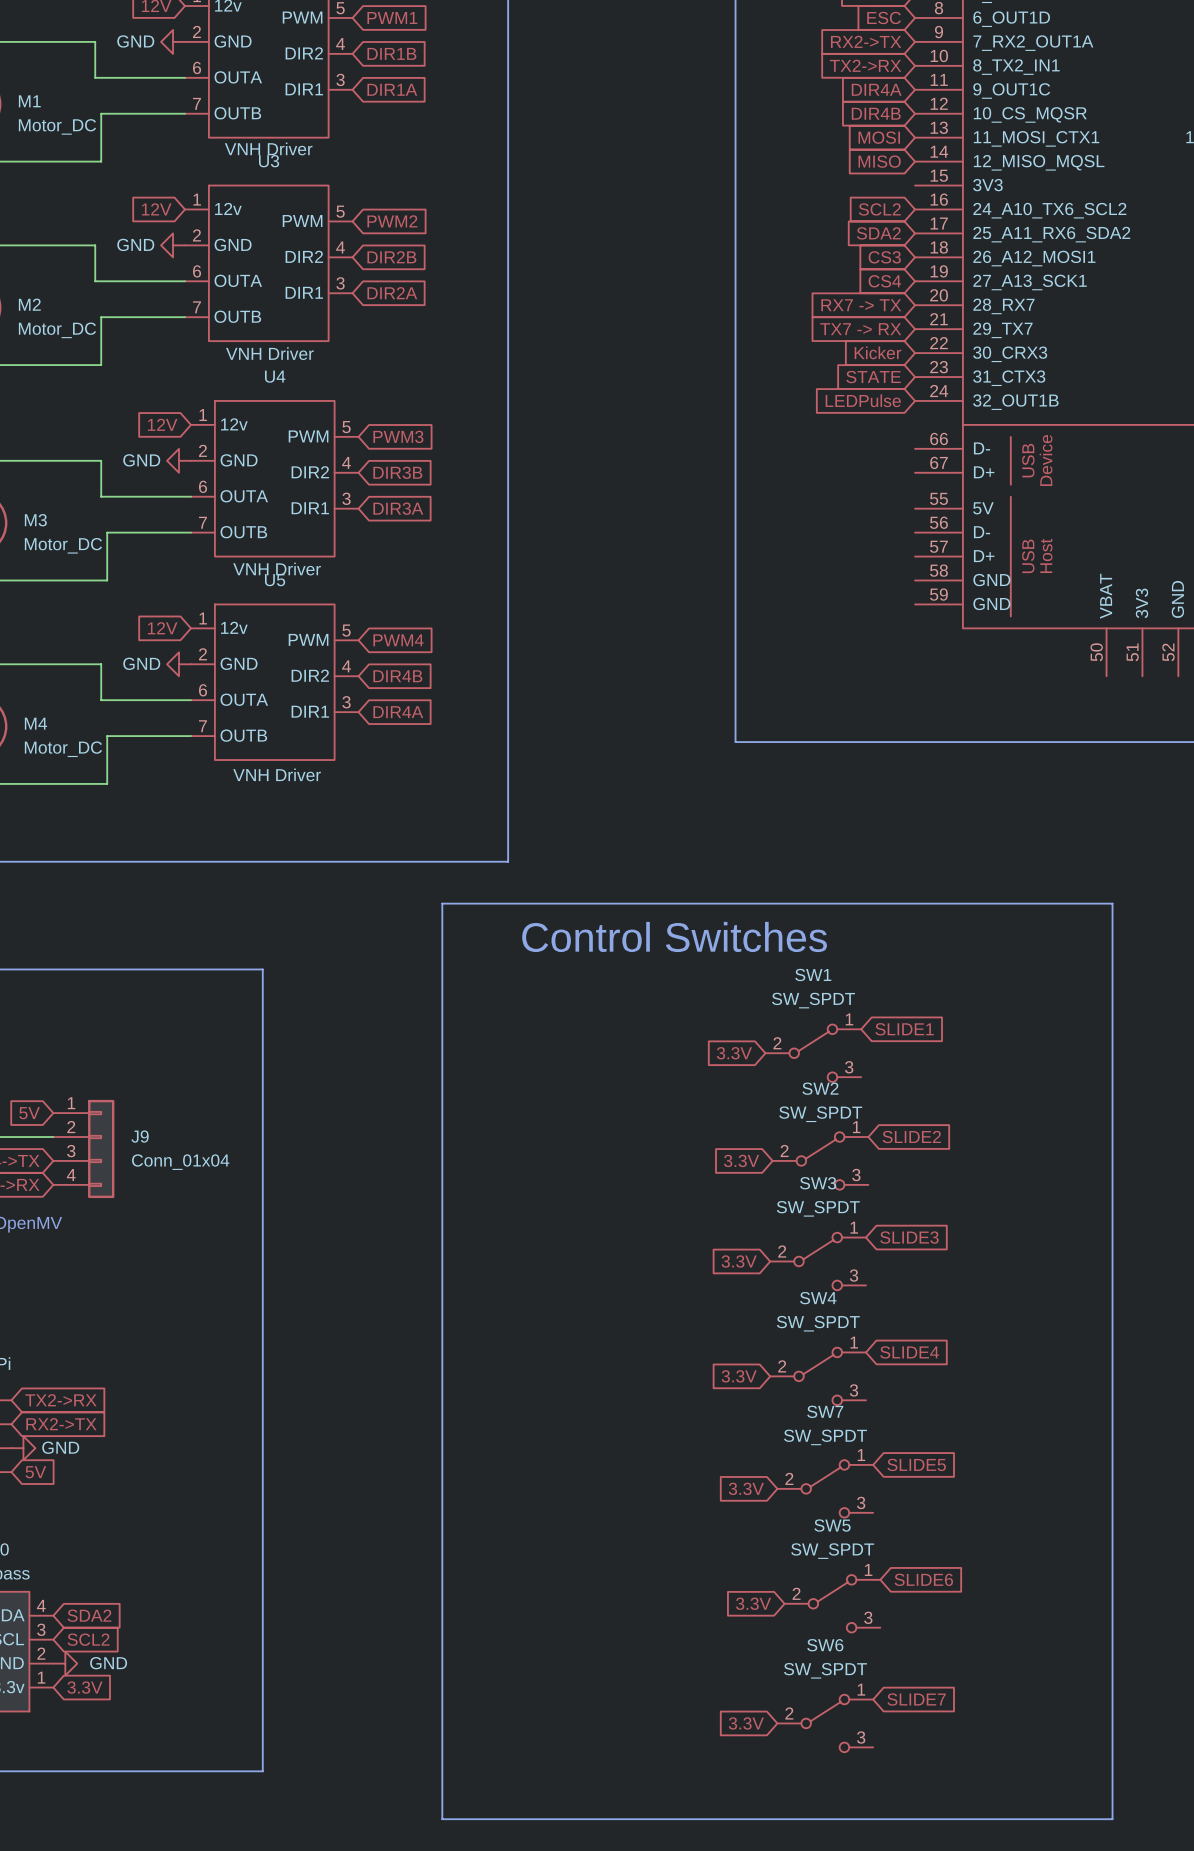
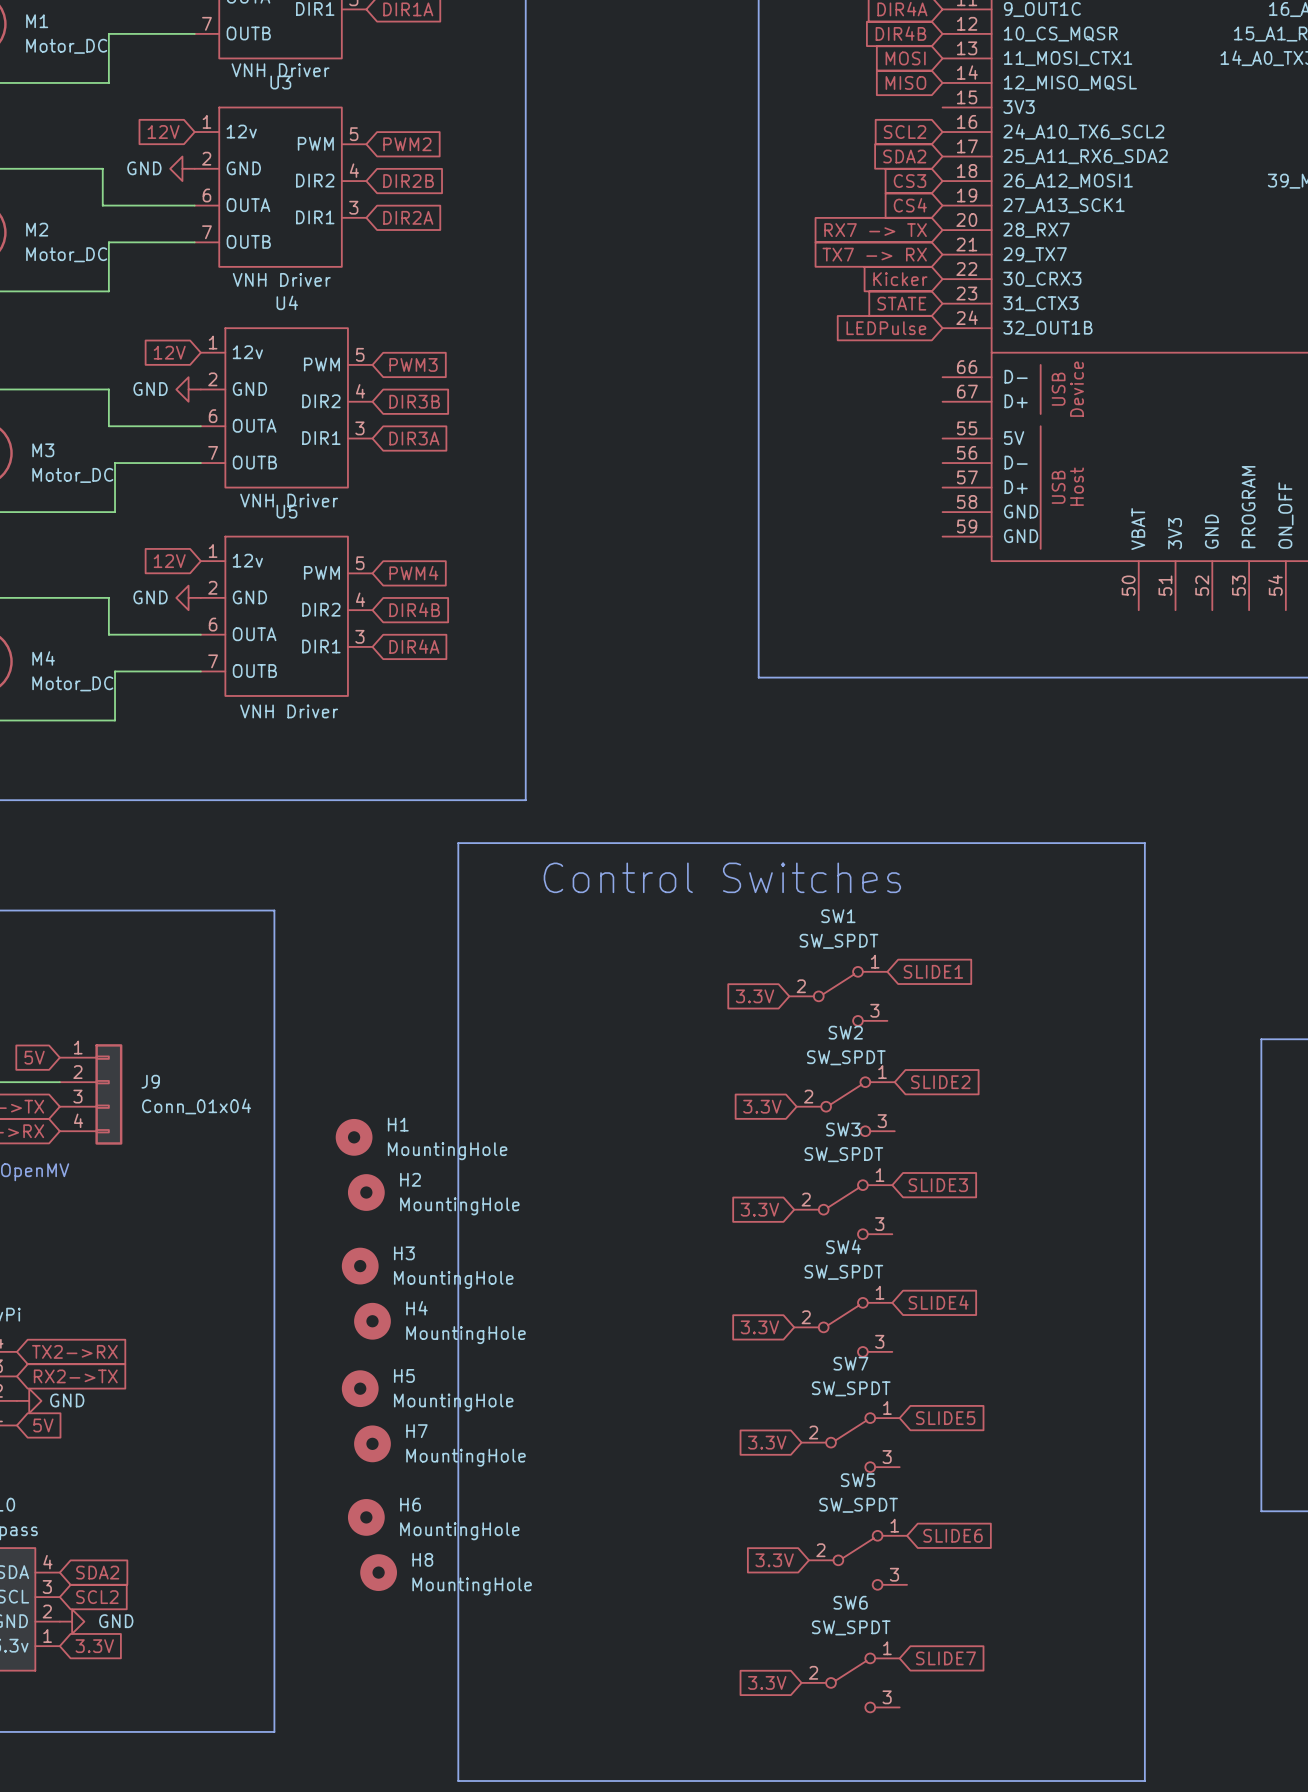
H1: none -> MountingHole (354, 1137)
H2: none -> MountingHole (366, 1192)
H3: none -> MountingHole (360, 1266)
H4: none -> MountingHole (372, 1321)
H5: none -> MountingHole (360, 1388)
H7: none -> MountingHole (372, 1443)
H6: none -> MountingHole (366, 1517)
H8: none -> MountingHole (378, 1572)

